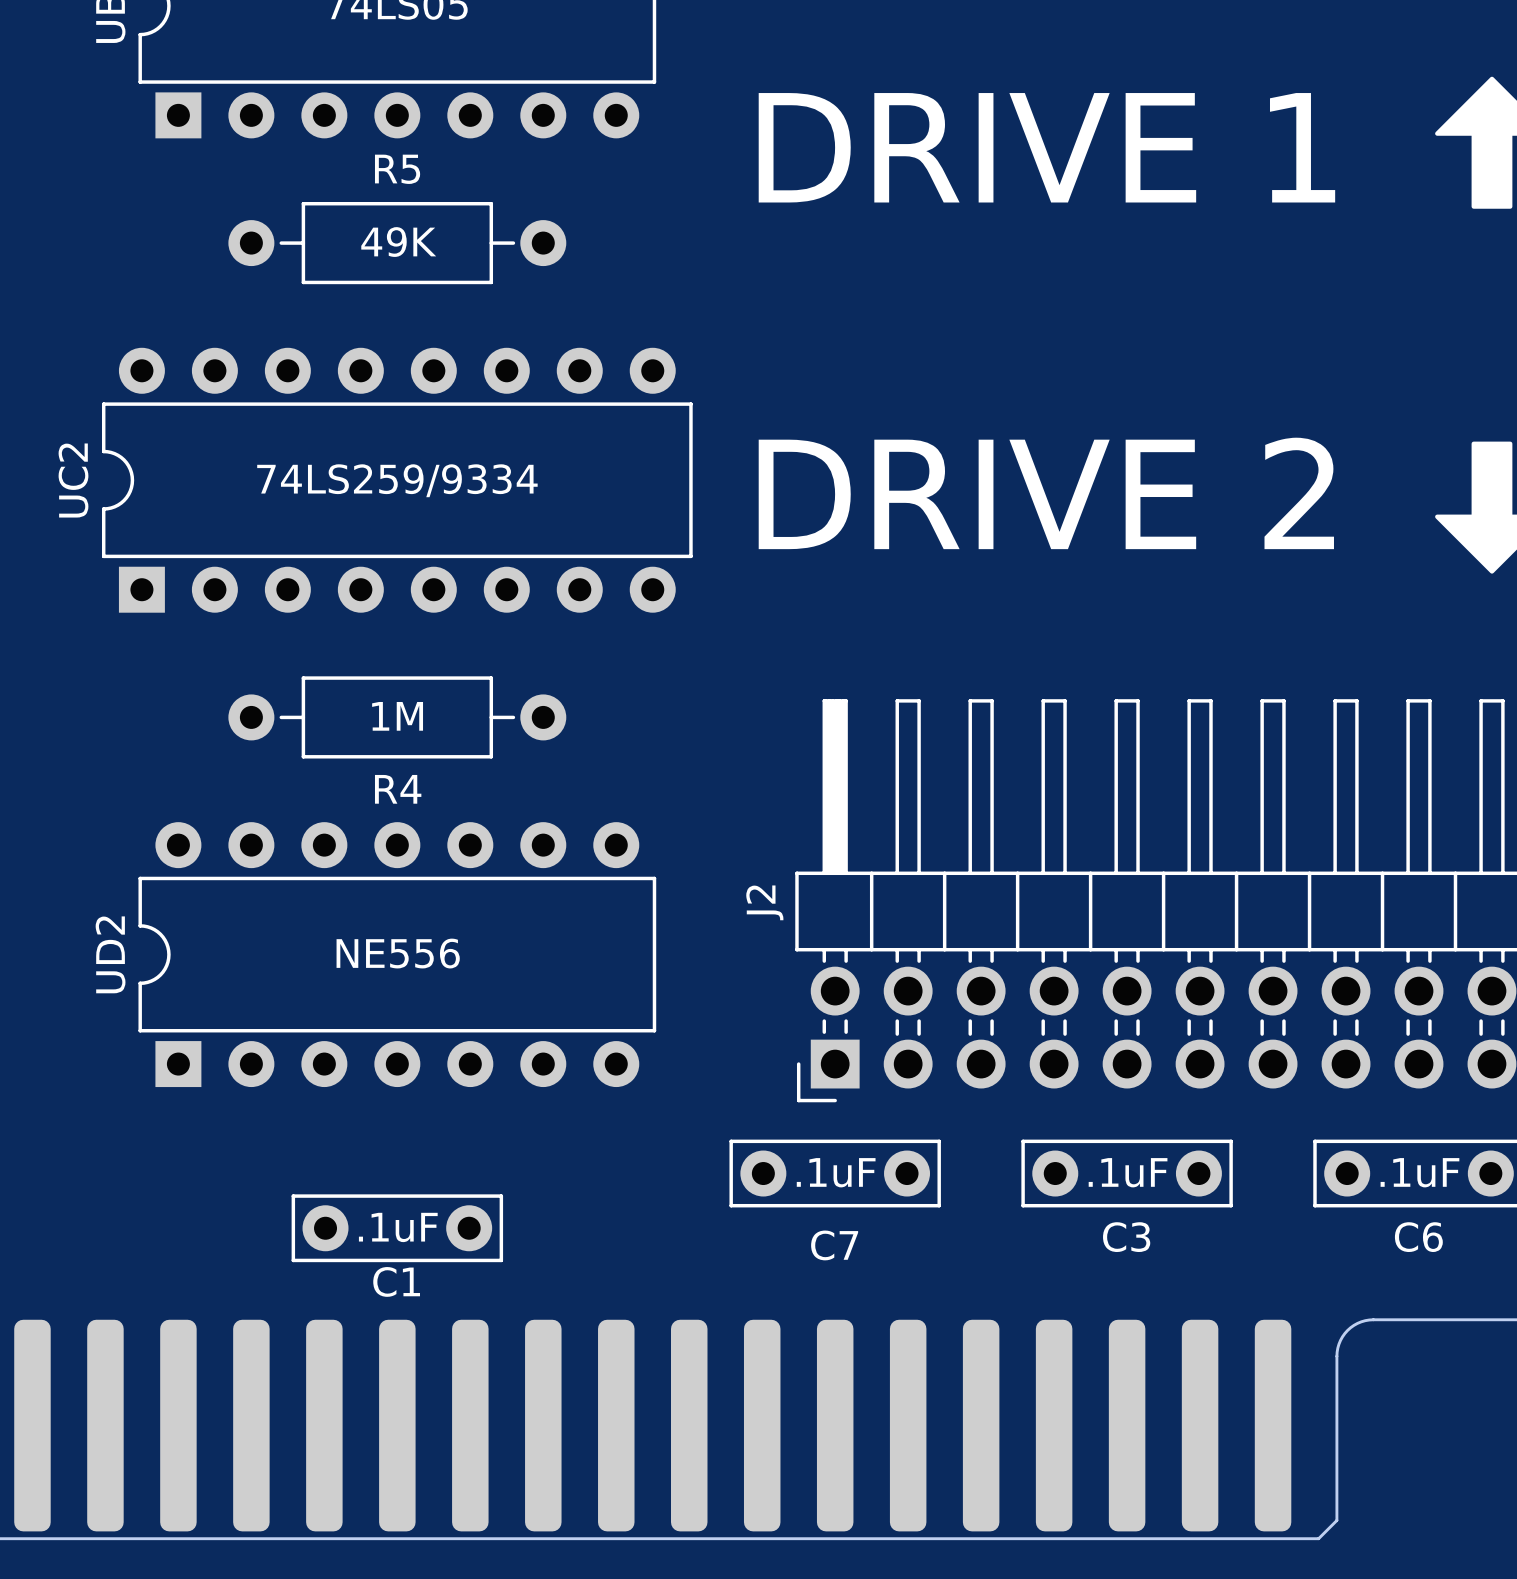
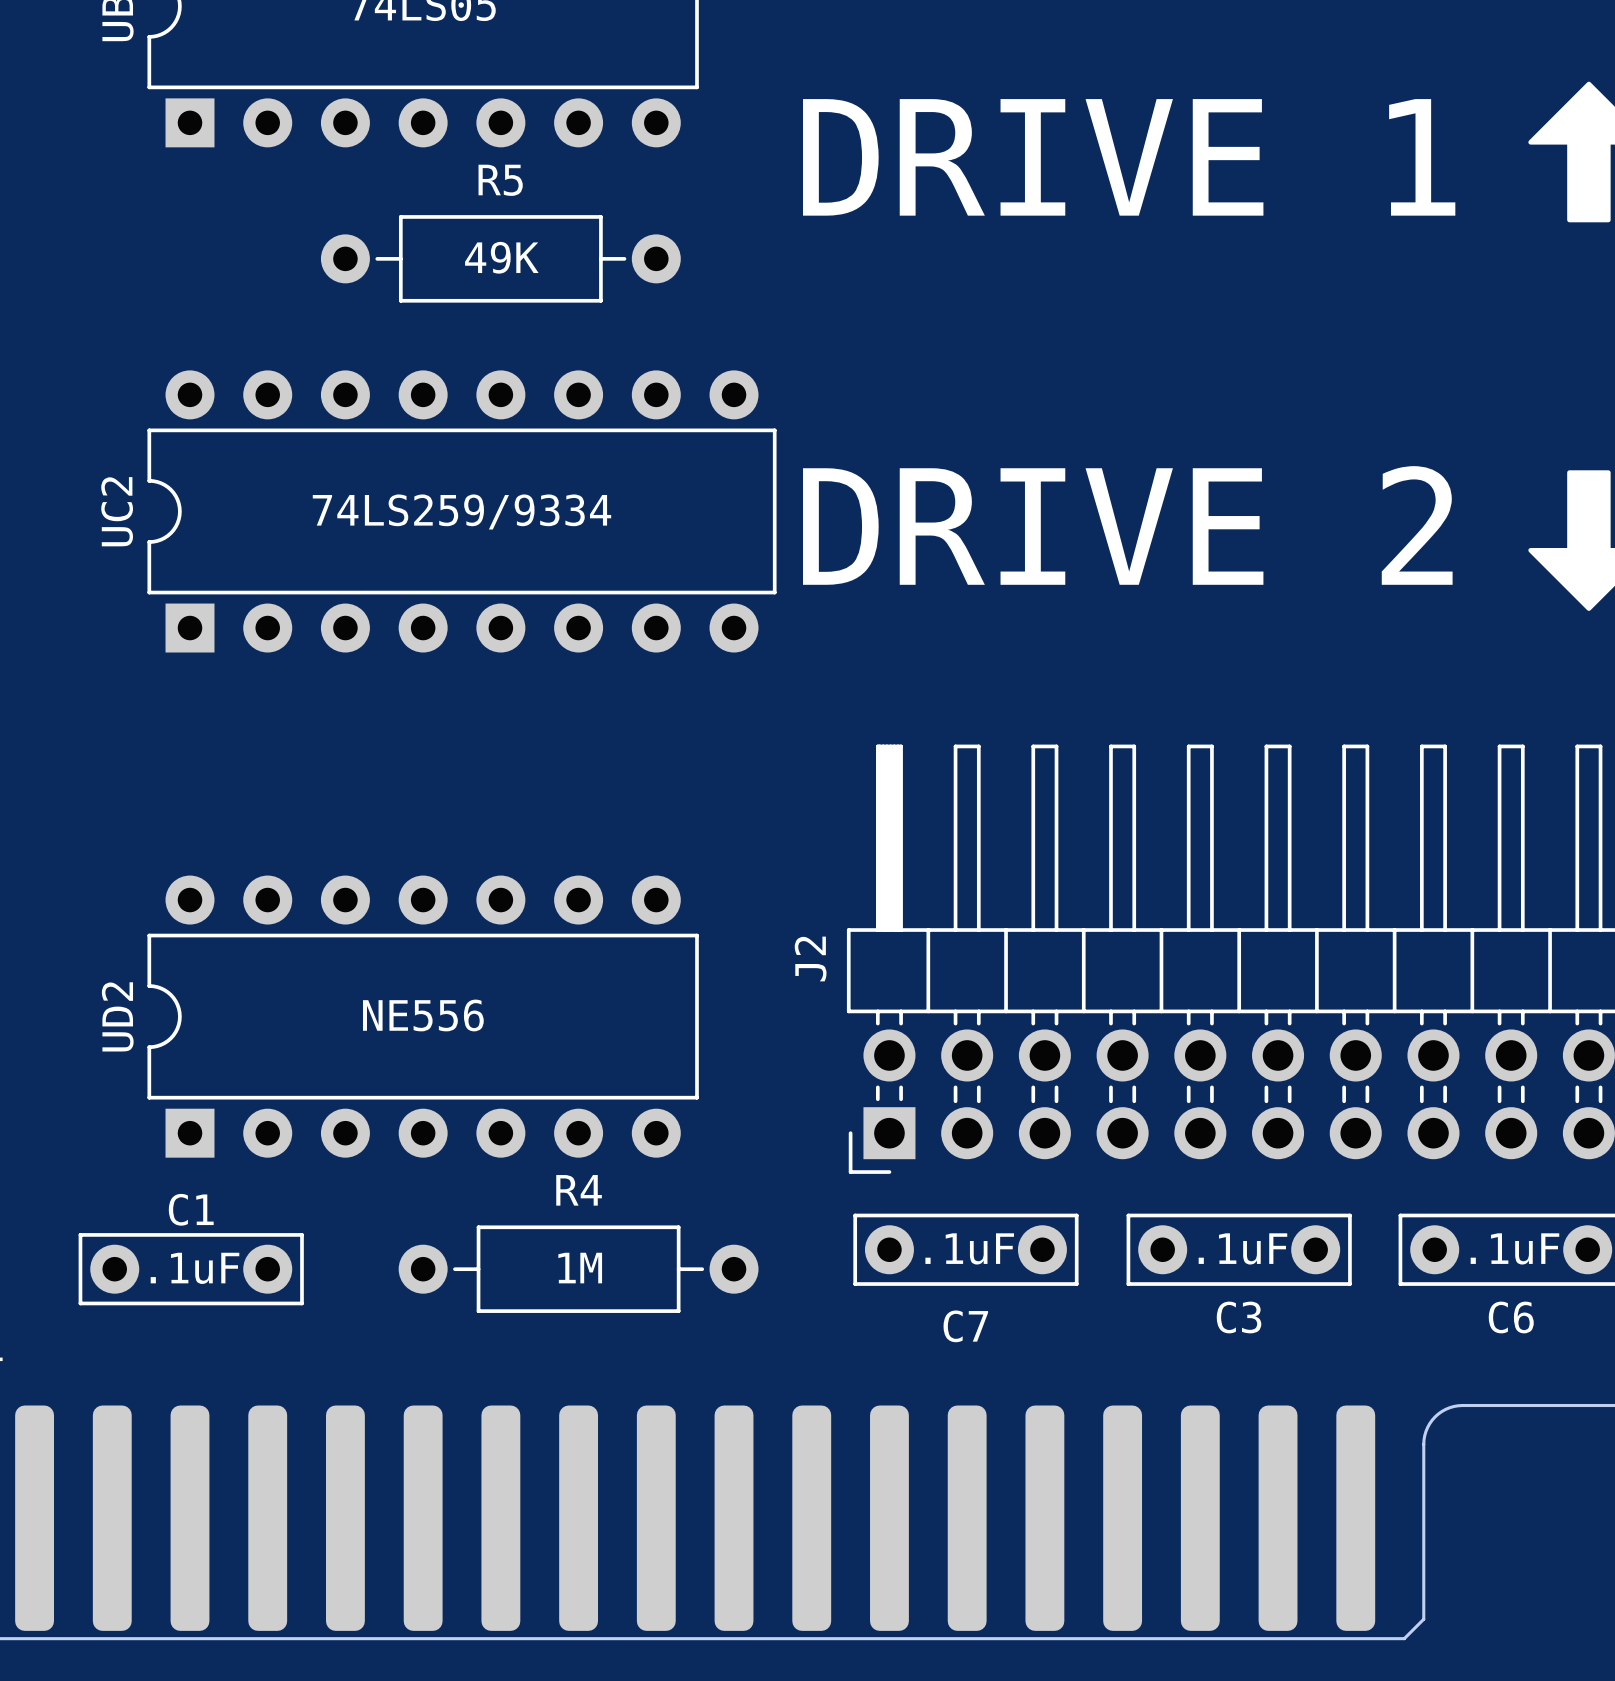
R5 position: (397, 243) -> (500, 258)
UC2 position: (397, 480) -> (462, 511)
R4 position: (397, 717) -> (578, 1269)
R4 name position: R4 (398, 789) -> R4 (579, 1190)
C7 position: (835, 1173) -> (965, 1249)
C3 position: (1127, 1173) -> (1239, 1249)
C1 position: (397, 1228) -> (191, 1269)
C1 name position: C1 (396, 1281) -> C1 (191, 1209)

